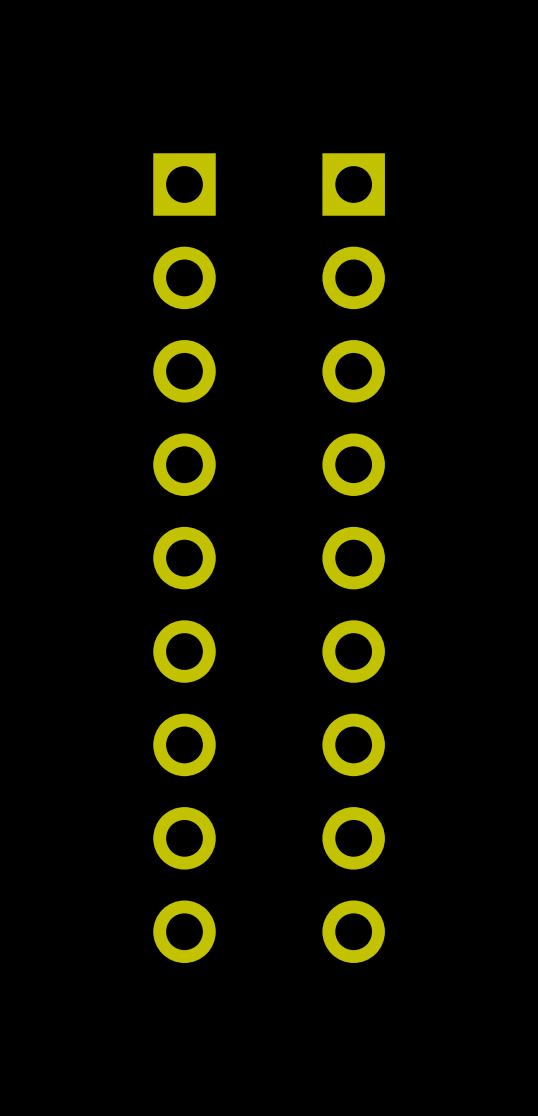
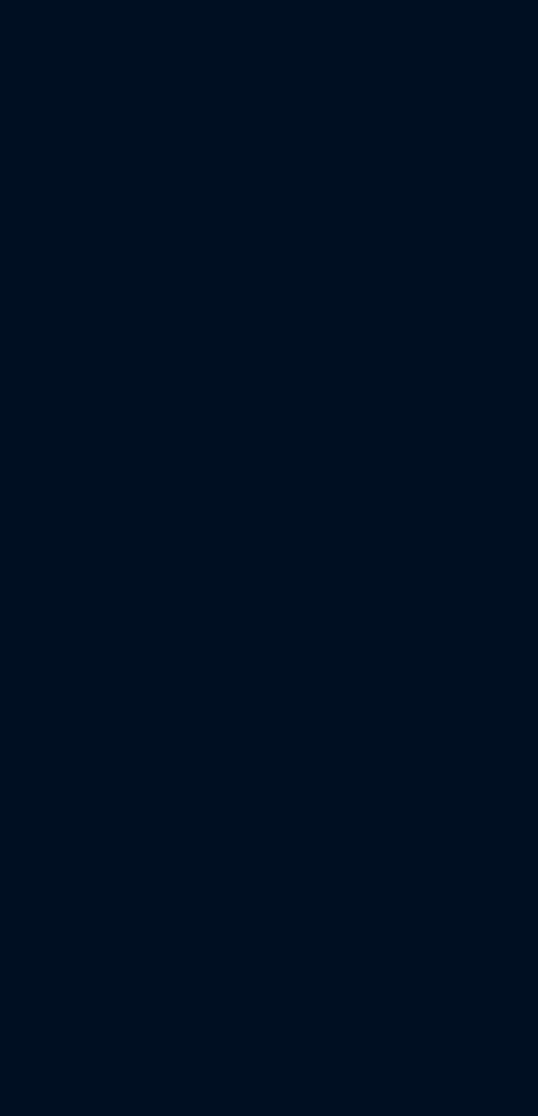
part: (184, 558) -> none
part: (353, 558) -> none

